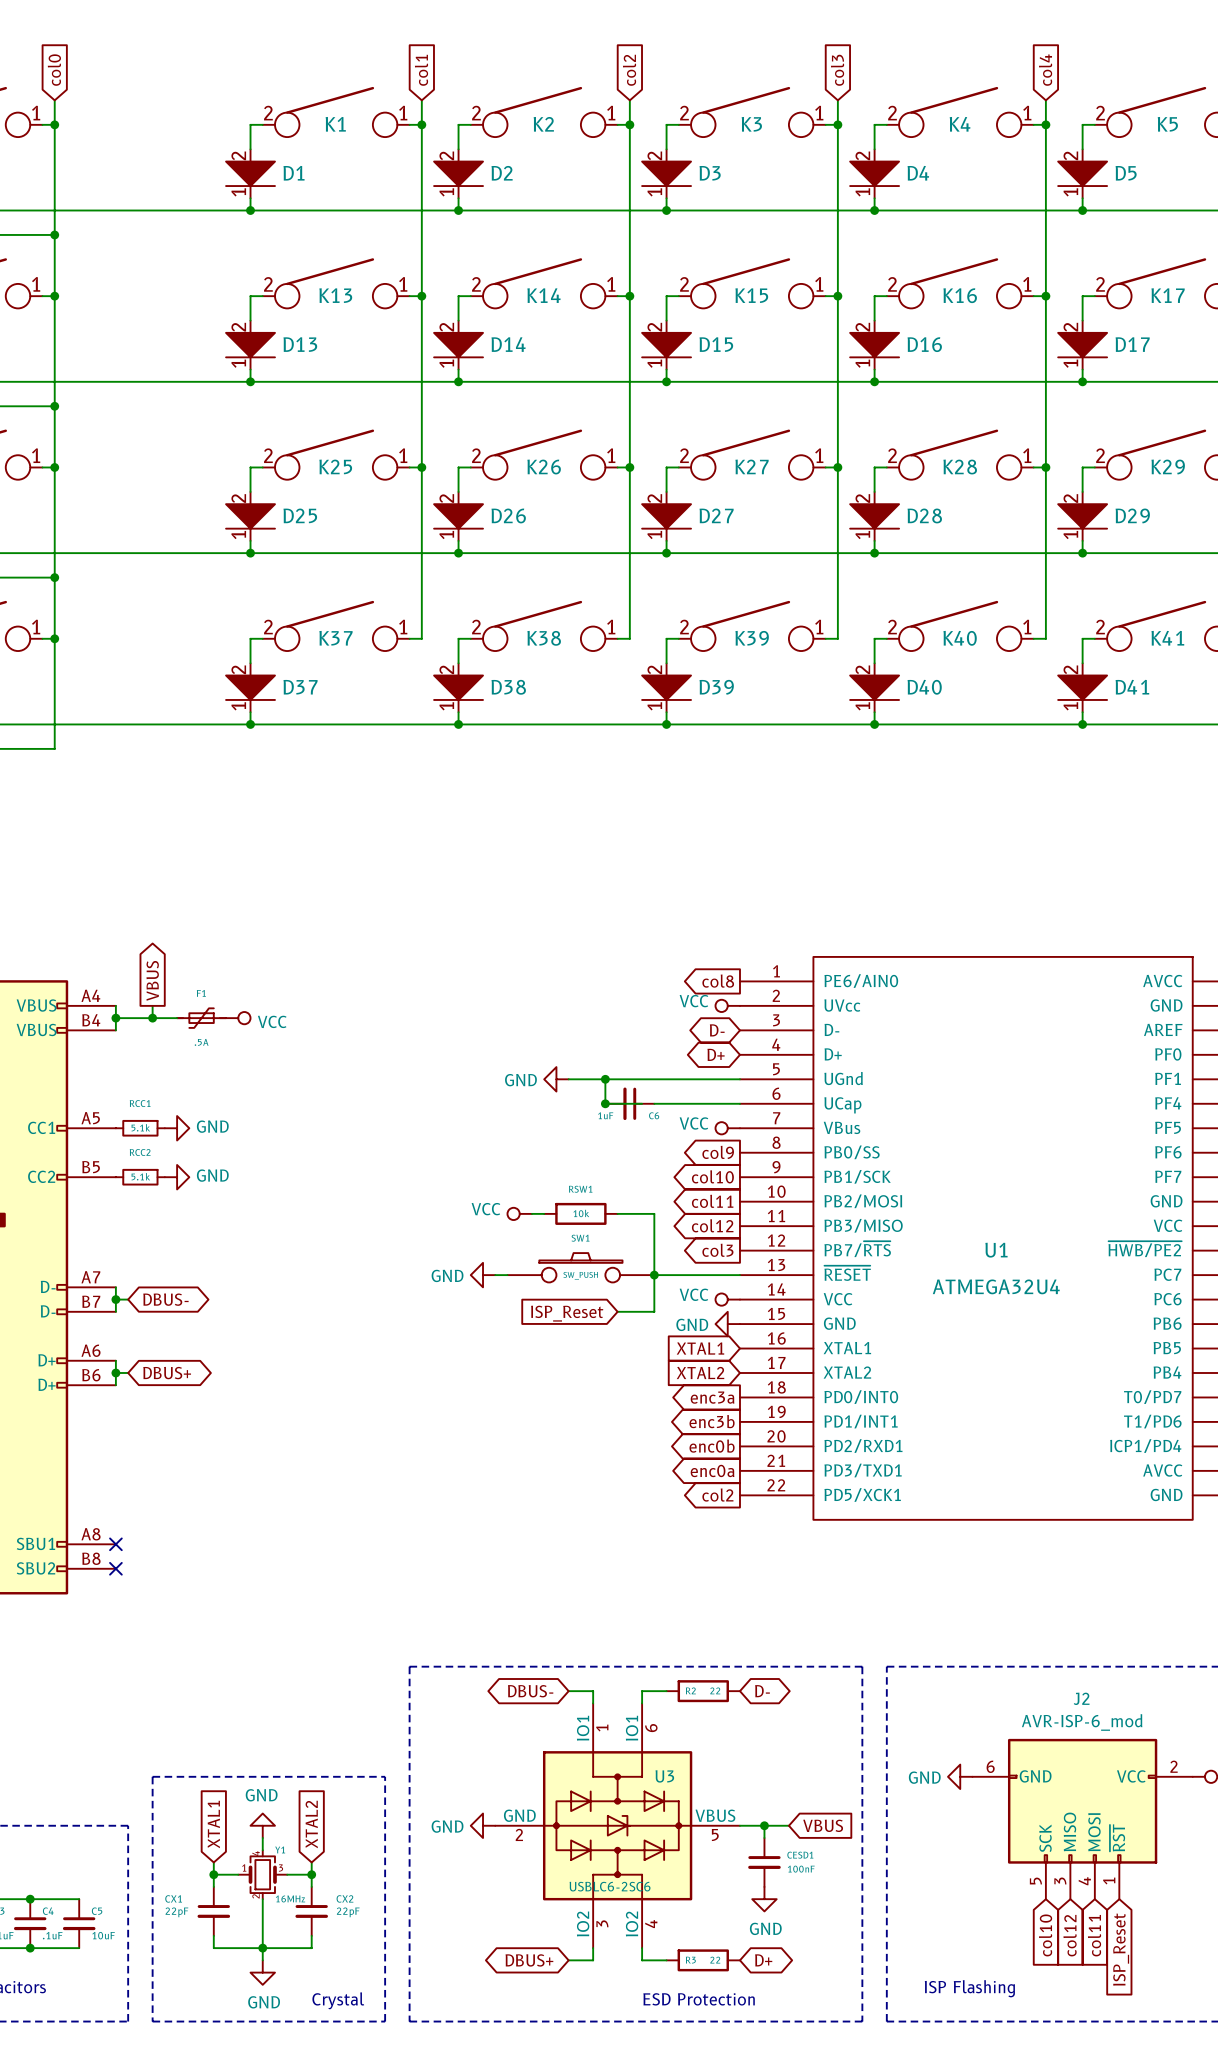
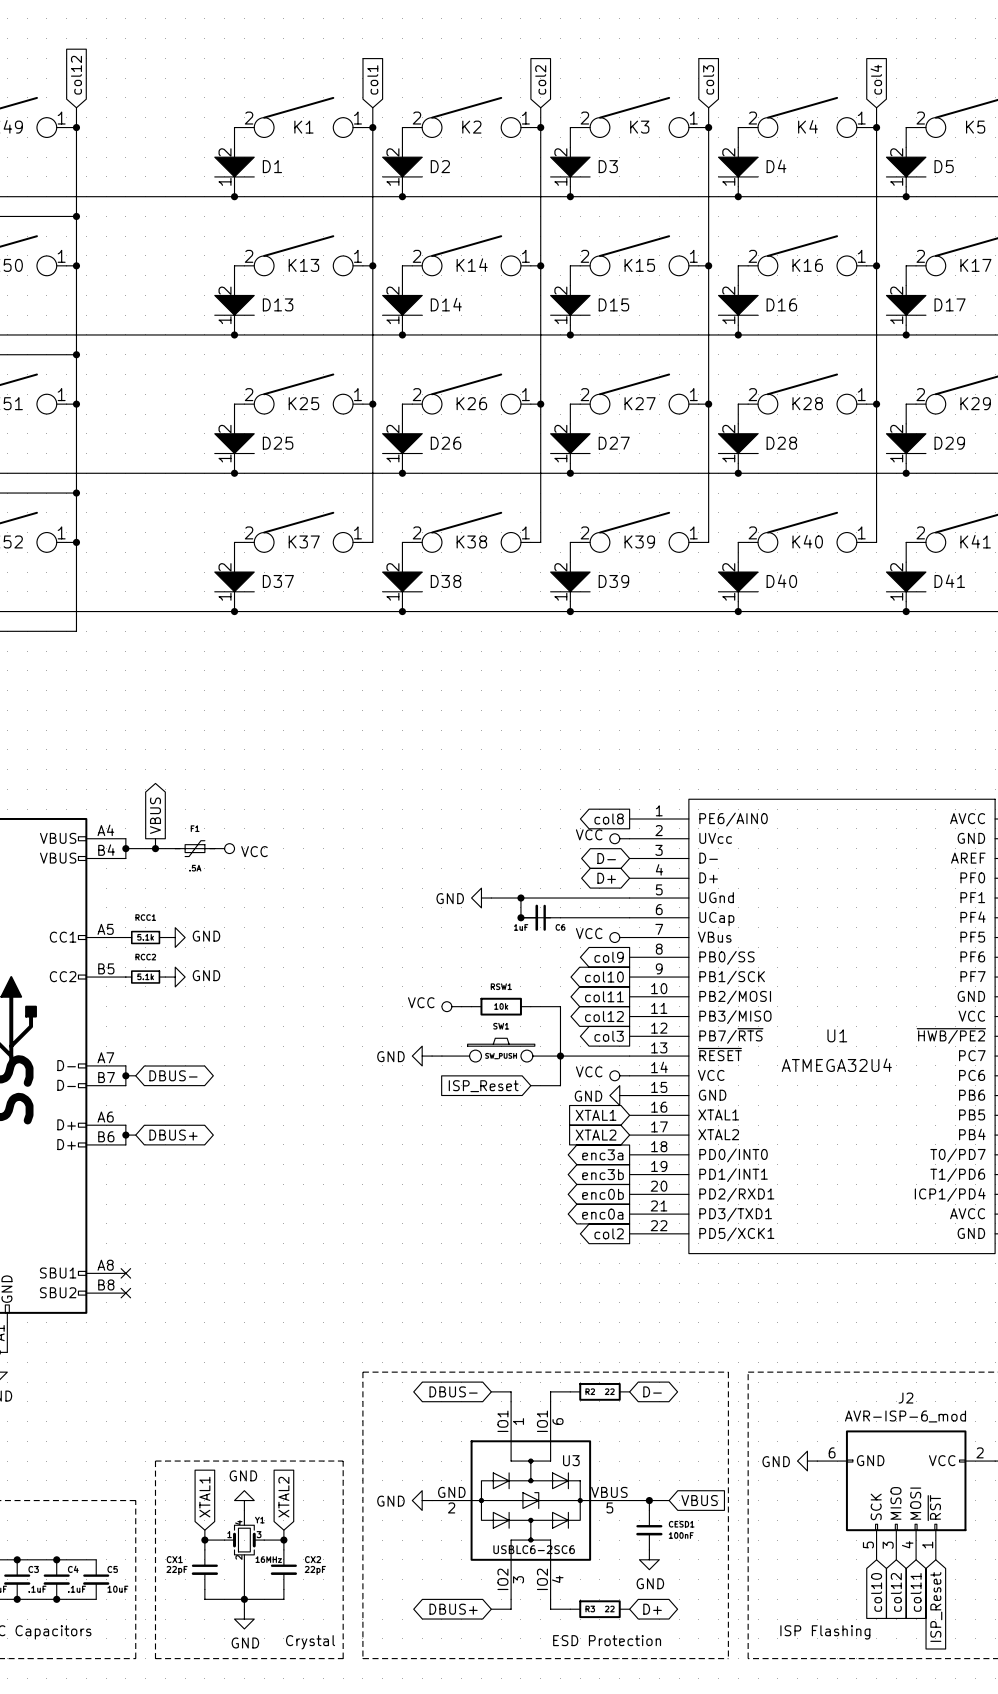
global label: col0 (54, 70) -> col12 (76, 75)

